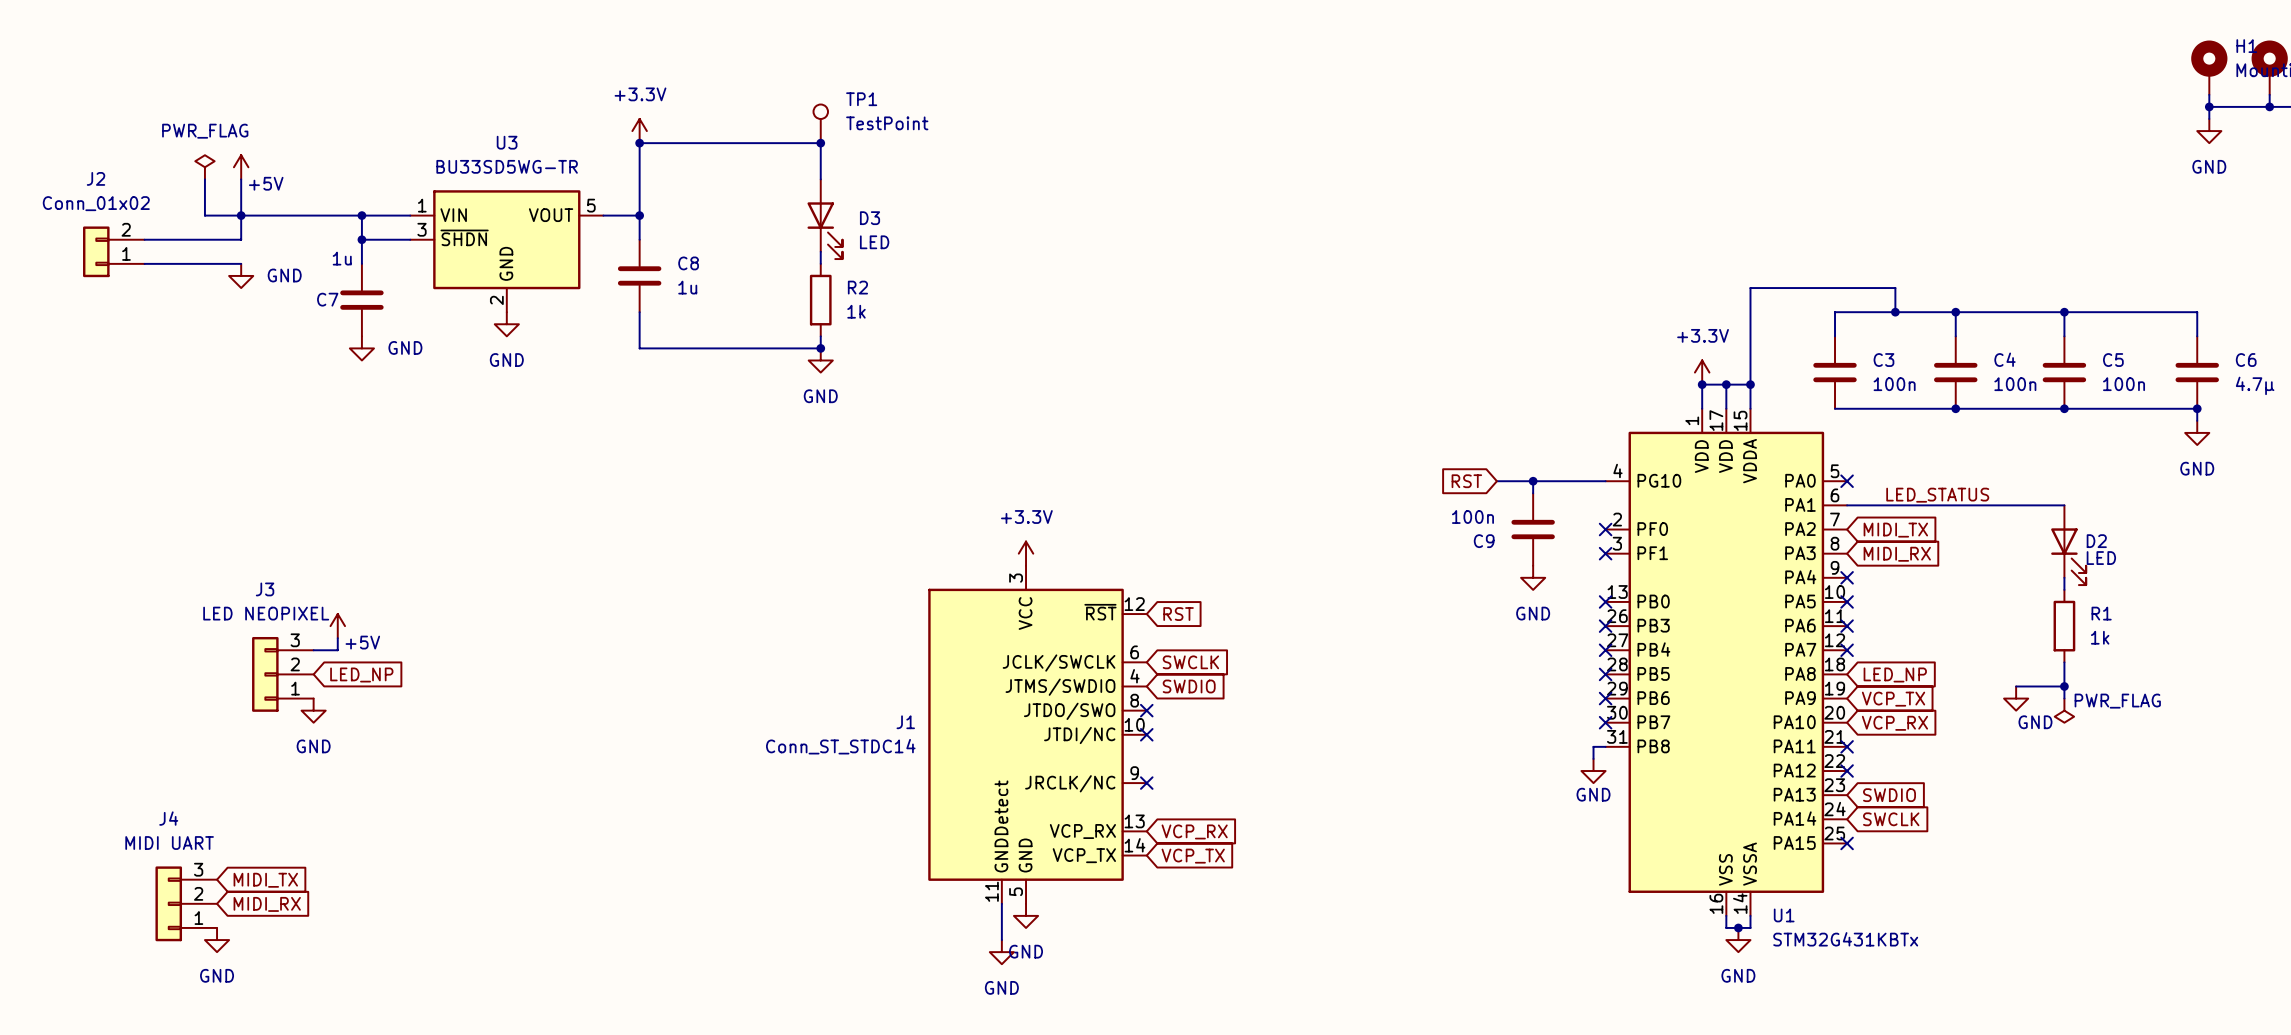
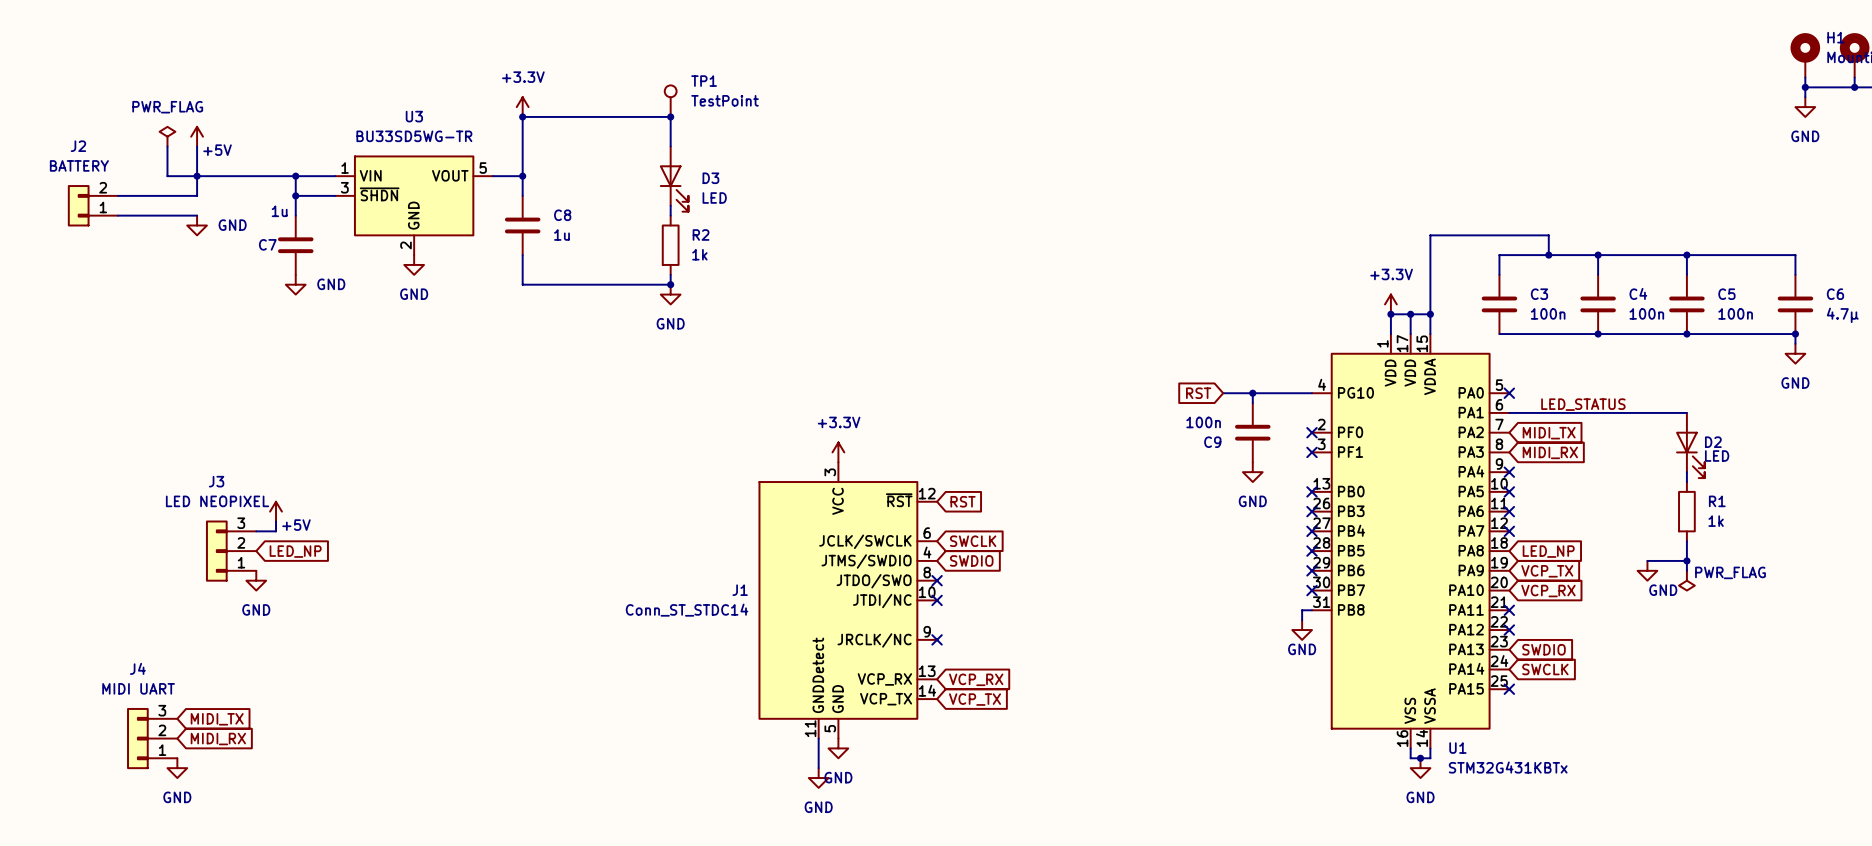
J2 value: Conn_01x02 (96, 203) -> BATTERY (79, 165)

